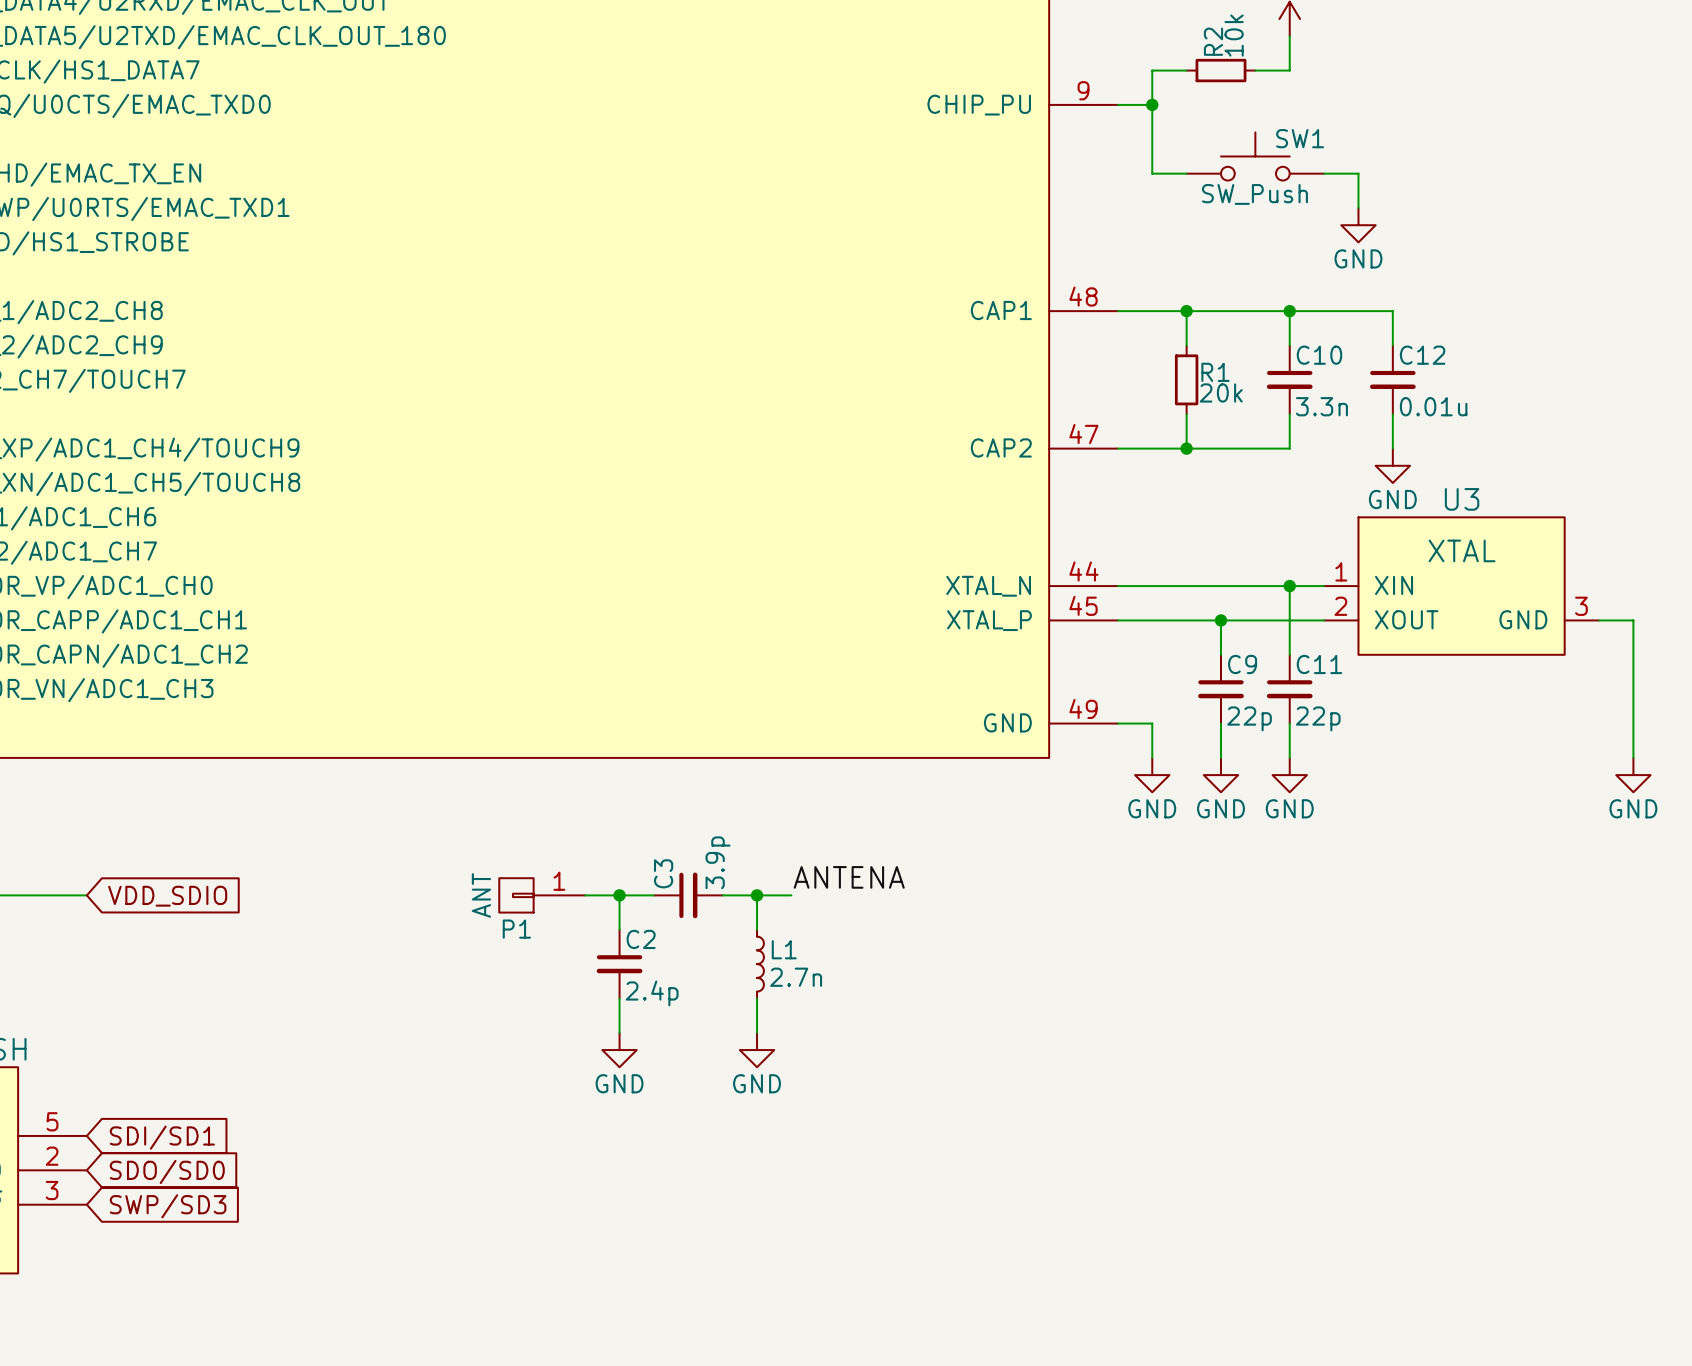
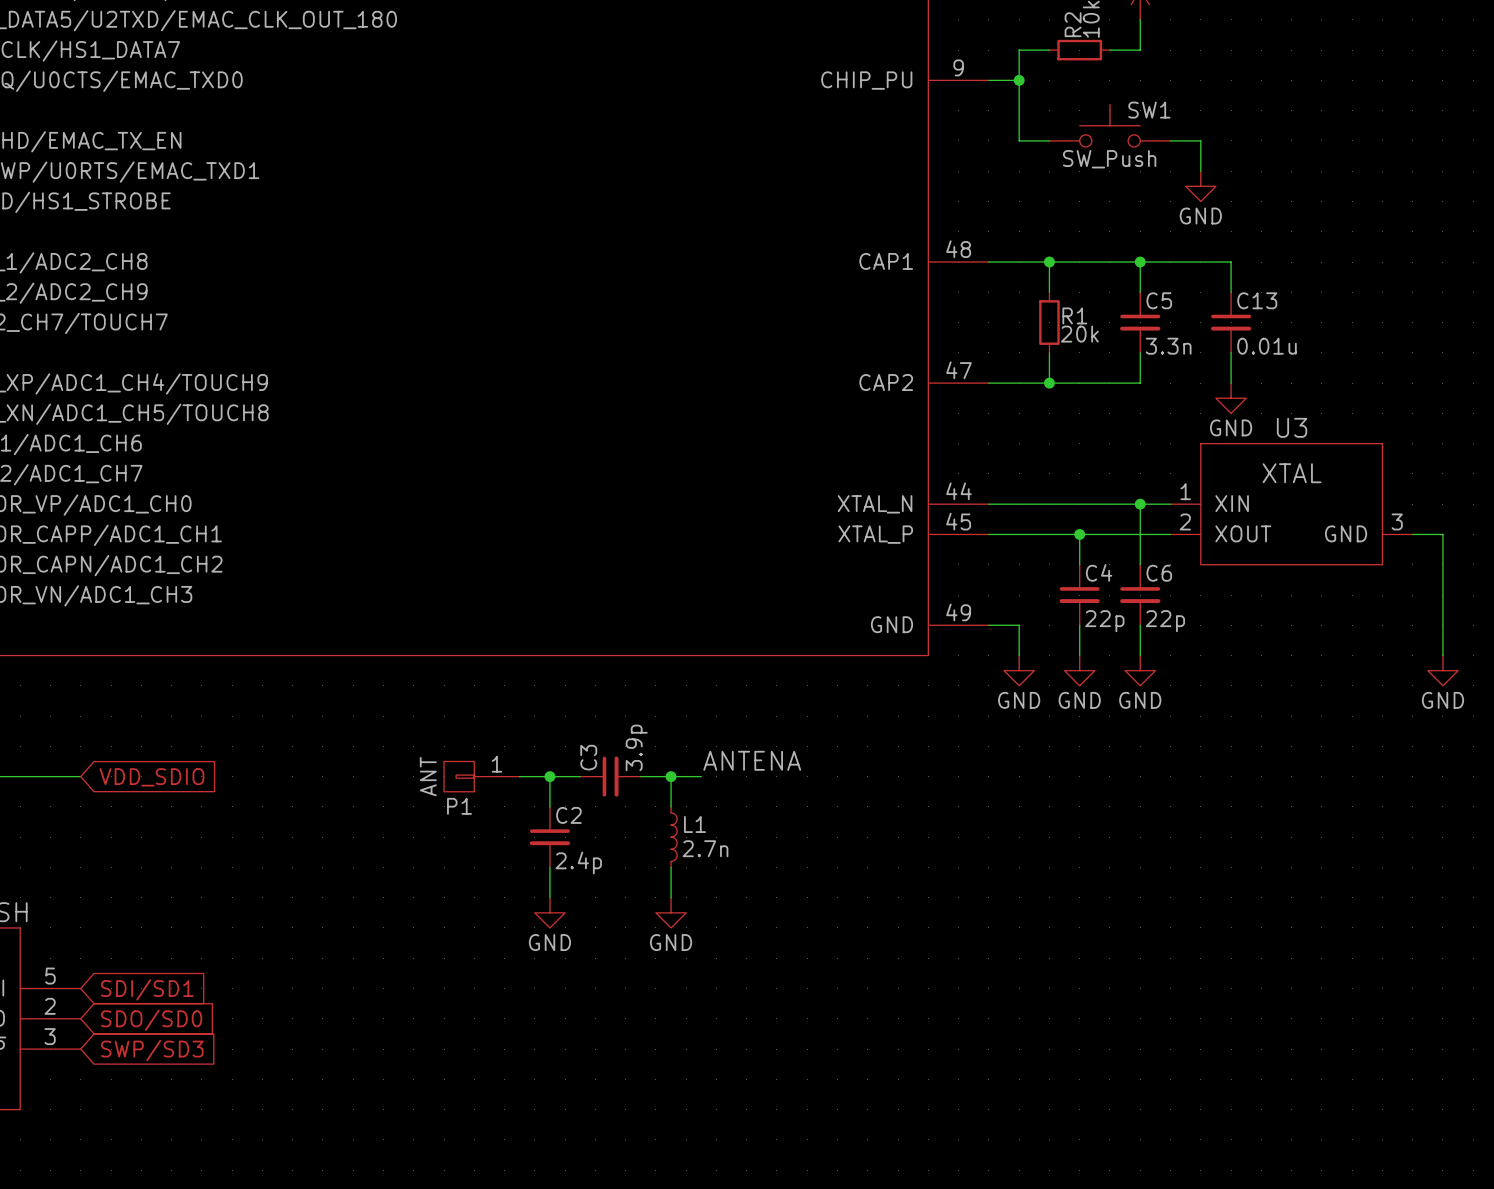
C10 name: C10 (1319, 355) -> C5 (1159, 300)
C12 name: C12 (1422, 355) -> C13 (1257, 300)
C9 name: C9 (1242, 664) -> C4 (1099, 572)
C11 name: C11 (1319, 664) -> C6 (1159, 573)

